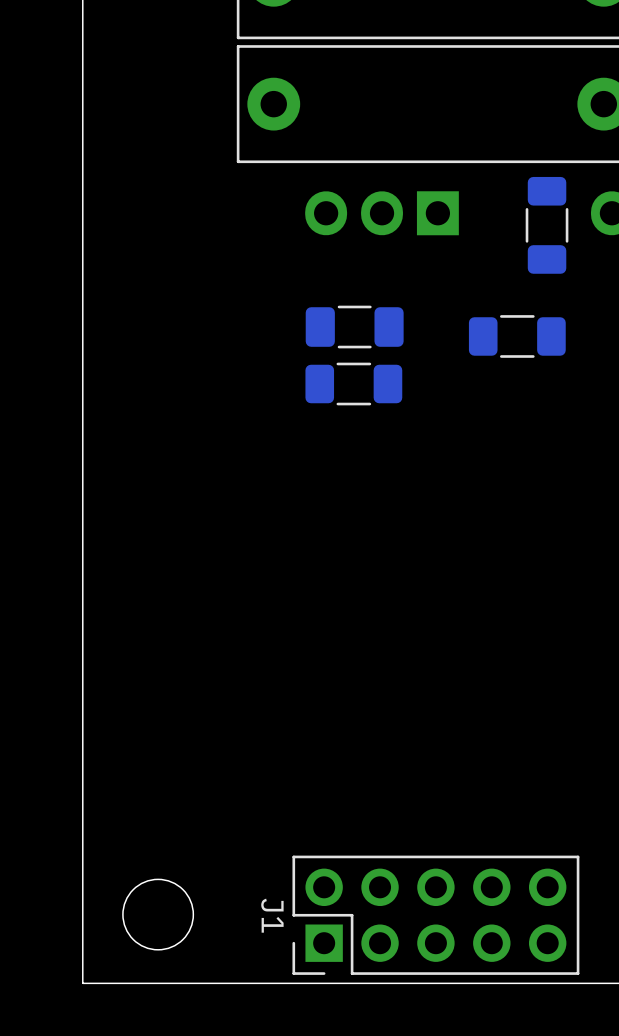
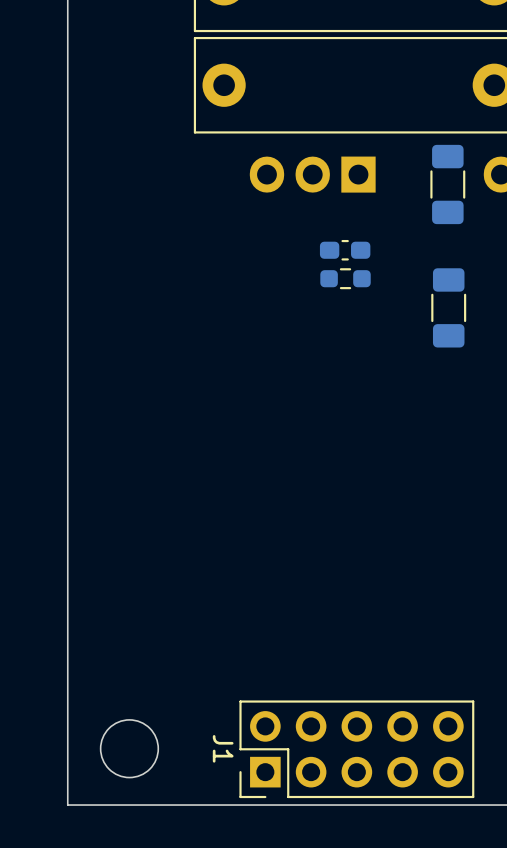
part: none -> (345, 250)
part: (354, 327) -> none
part rotation: 0° (517, 336) -> 90° clockwise (448, 307)
part: none -> (345, 278)
part: (353, 384) -> none

